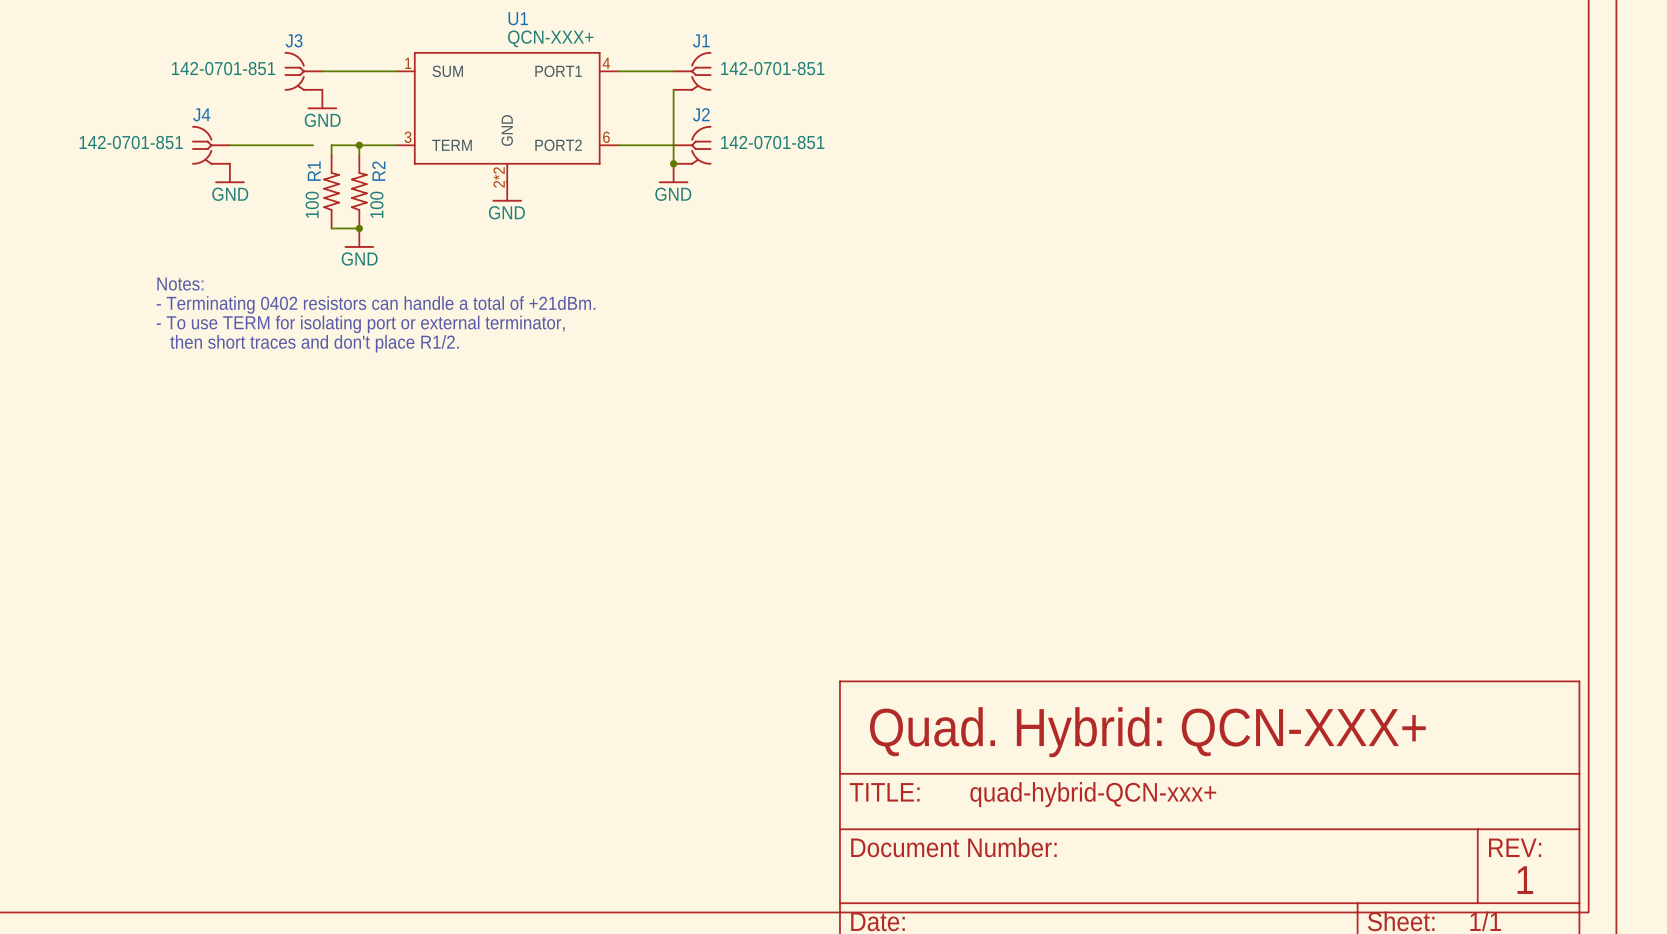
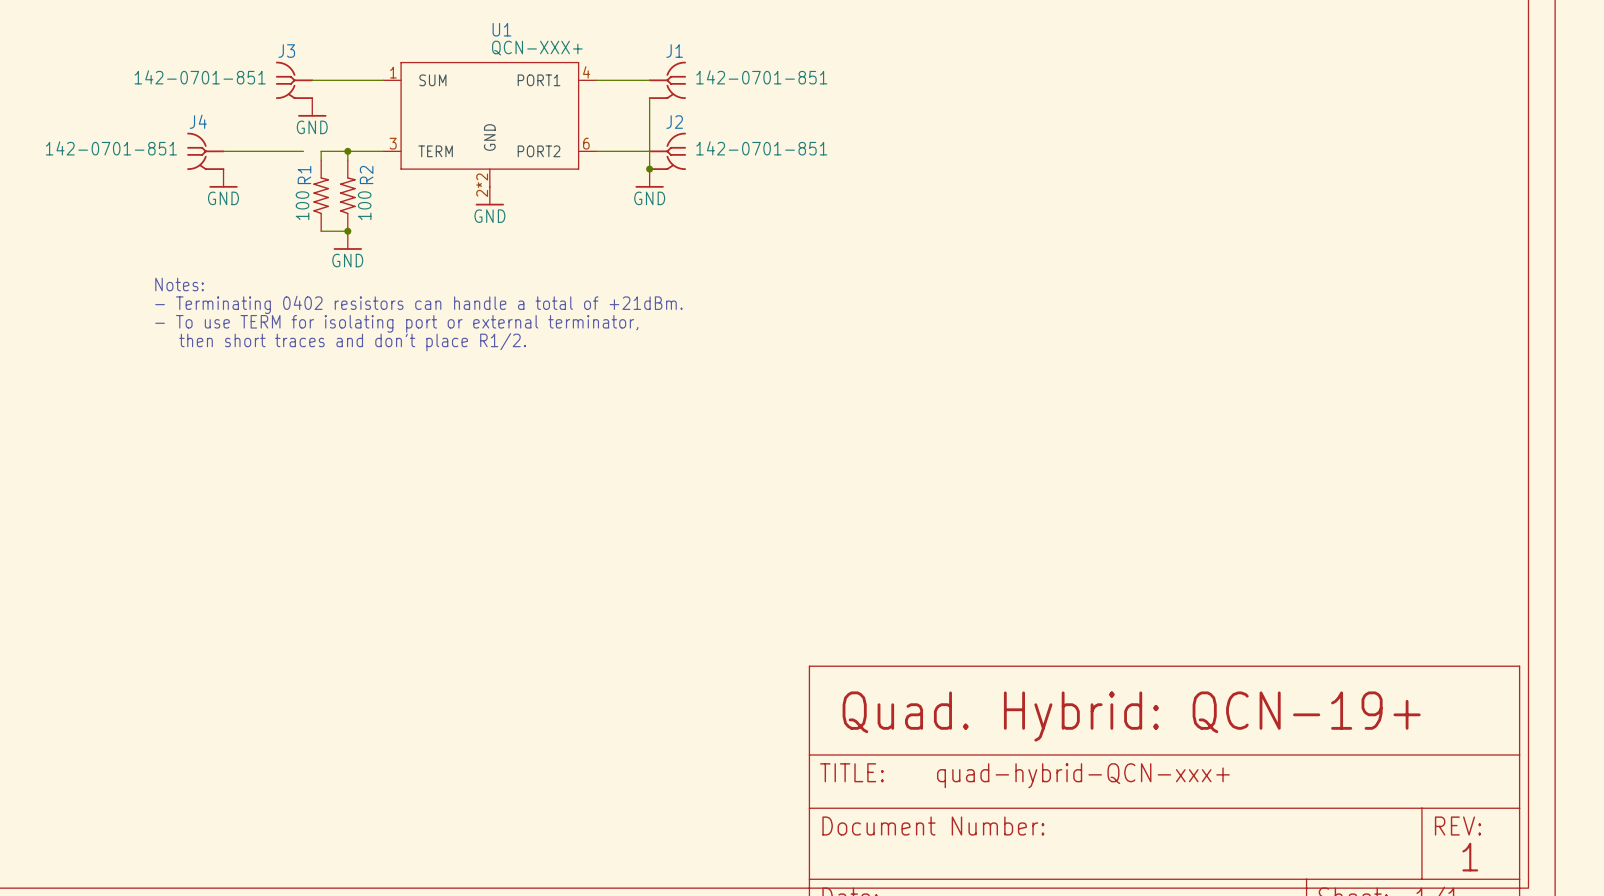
text: Quad. Hybrid: QCN-XXX+ (1147, 732) -> Quad. Hybrid: QCN-19+ (1131, 716)

